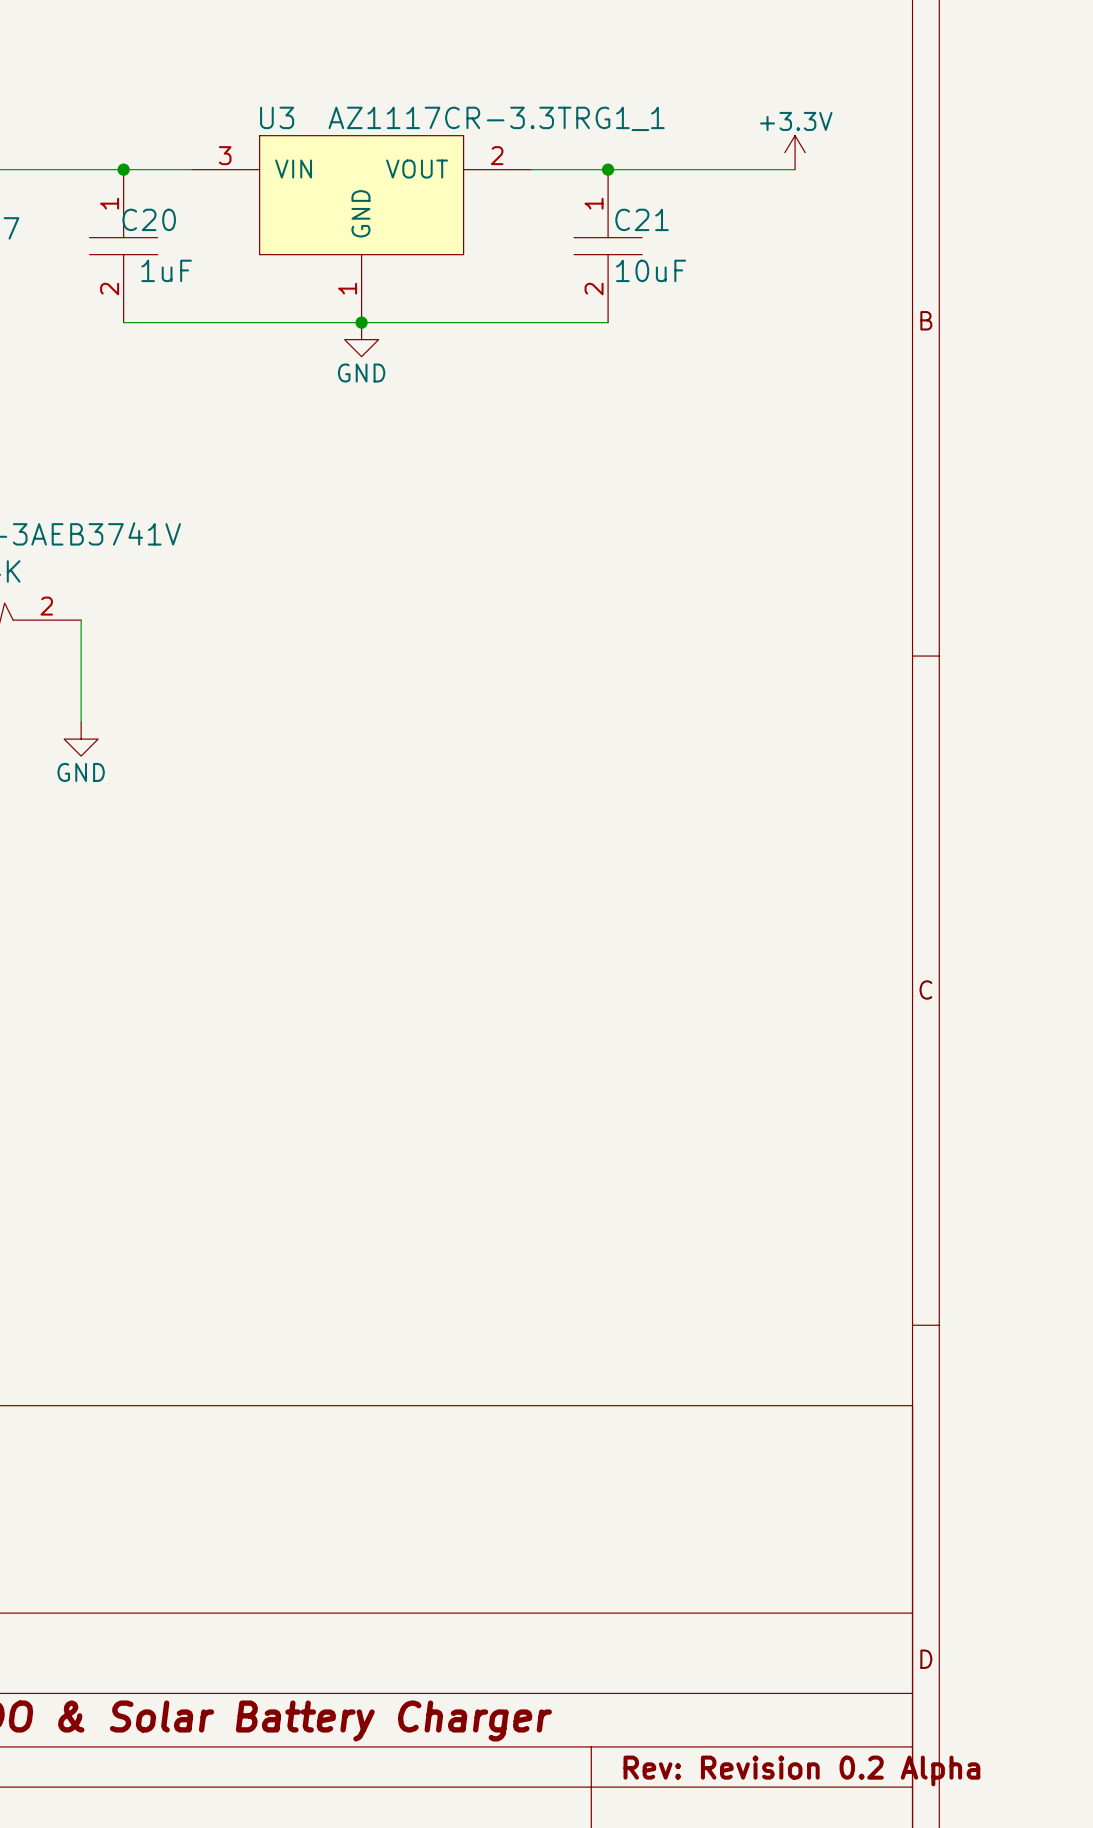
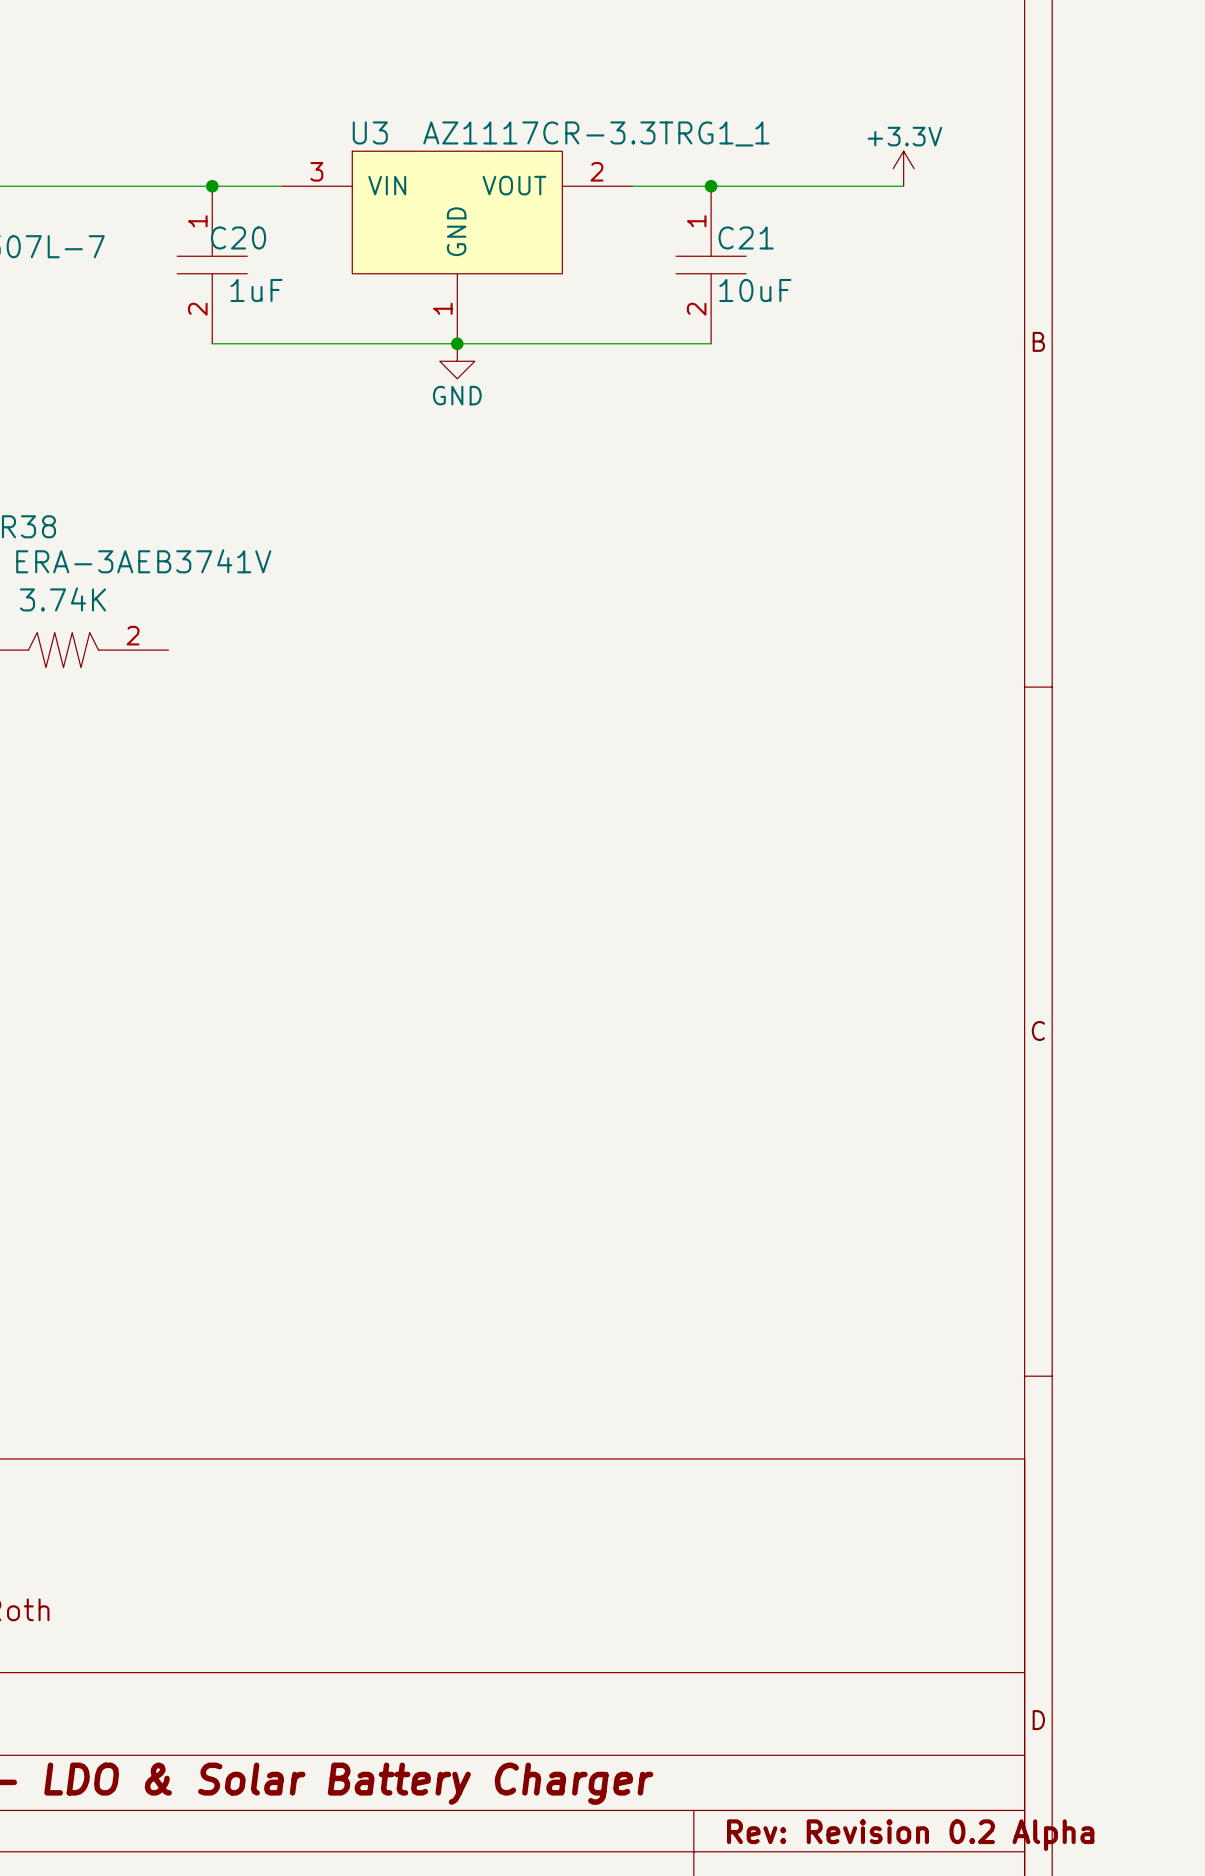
wire: (81, 620) (81, 722) -> none
power symbol: GND (81, 739) -> none

